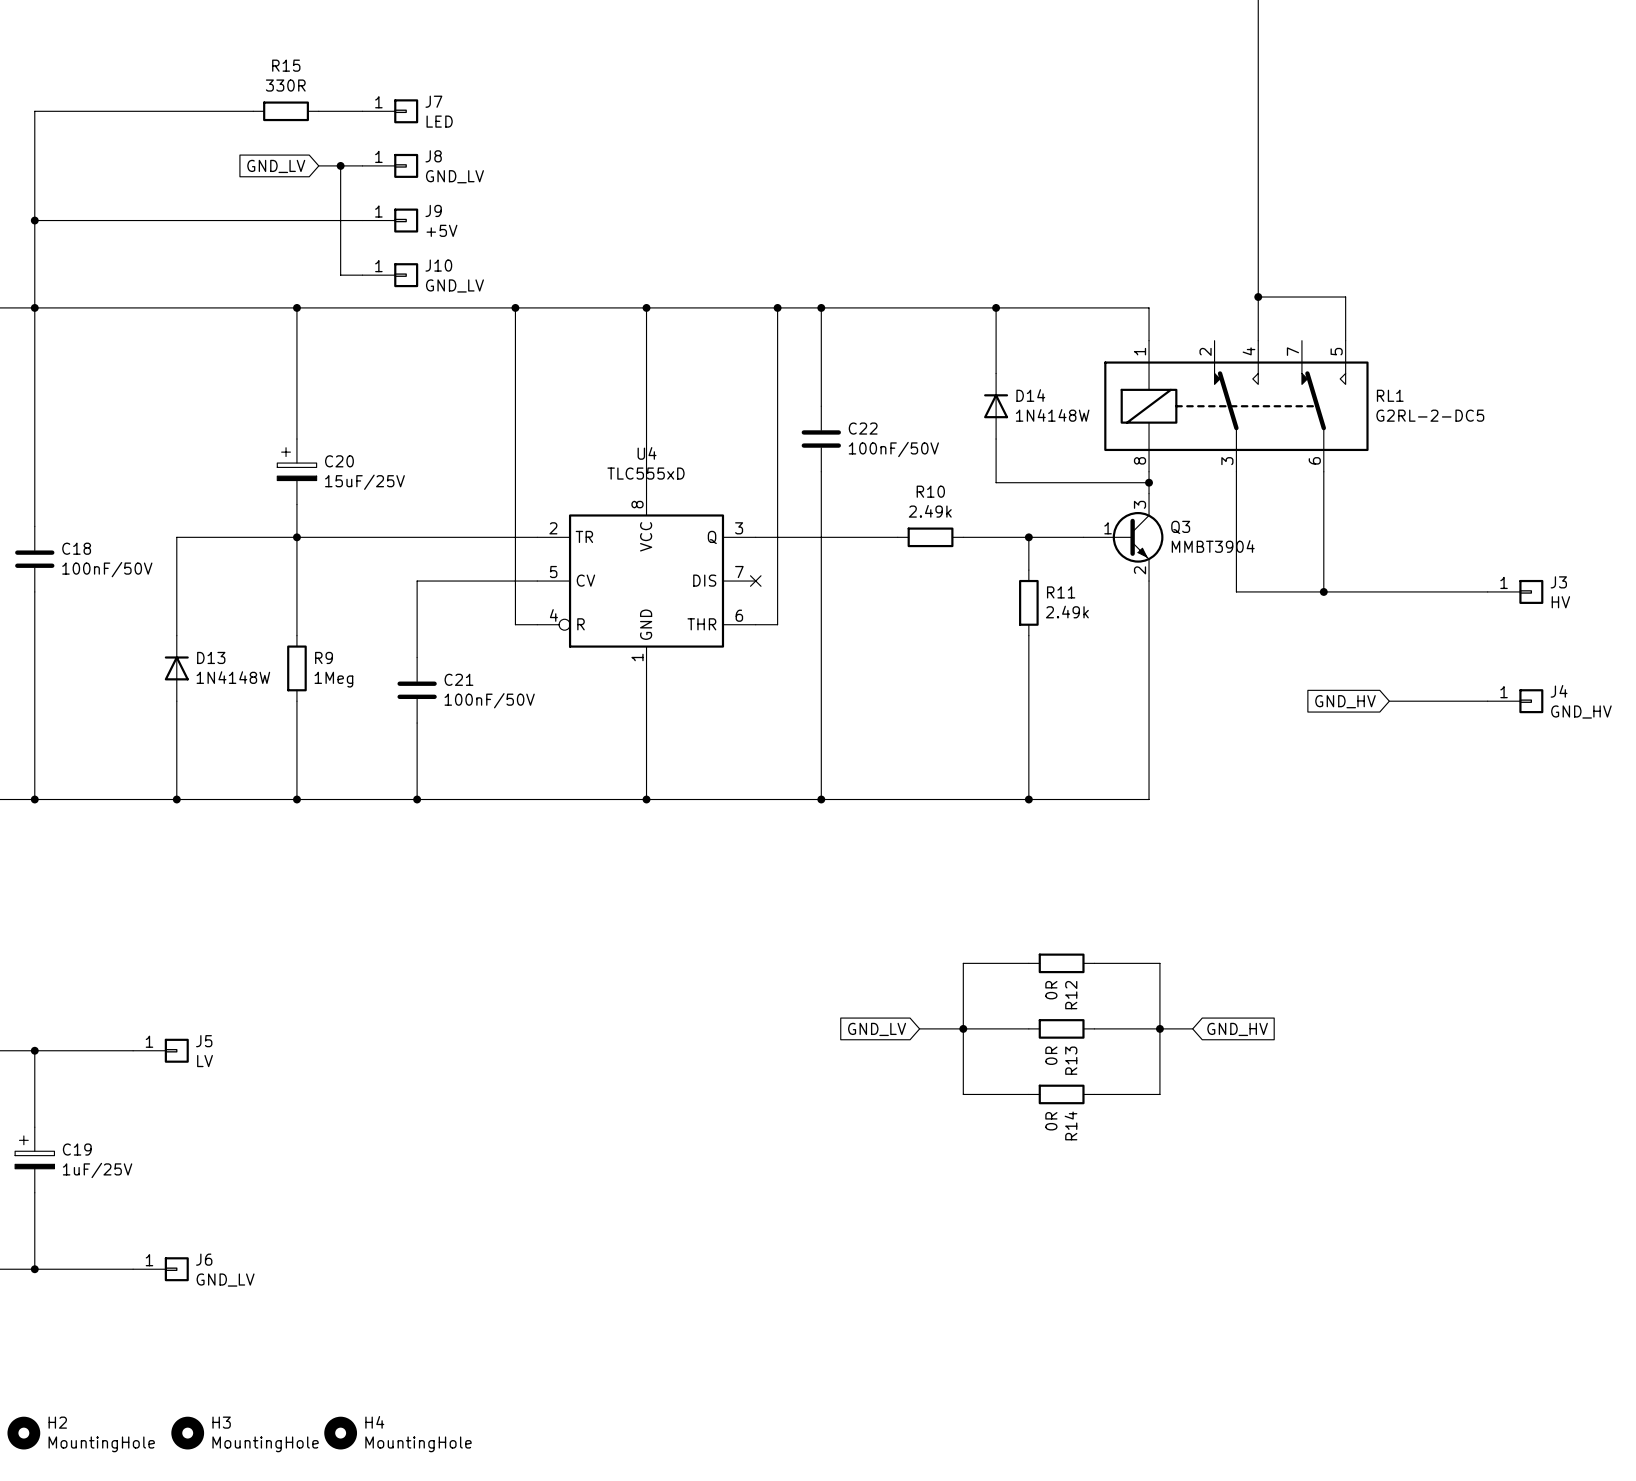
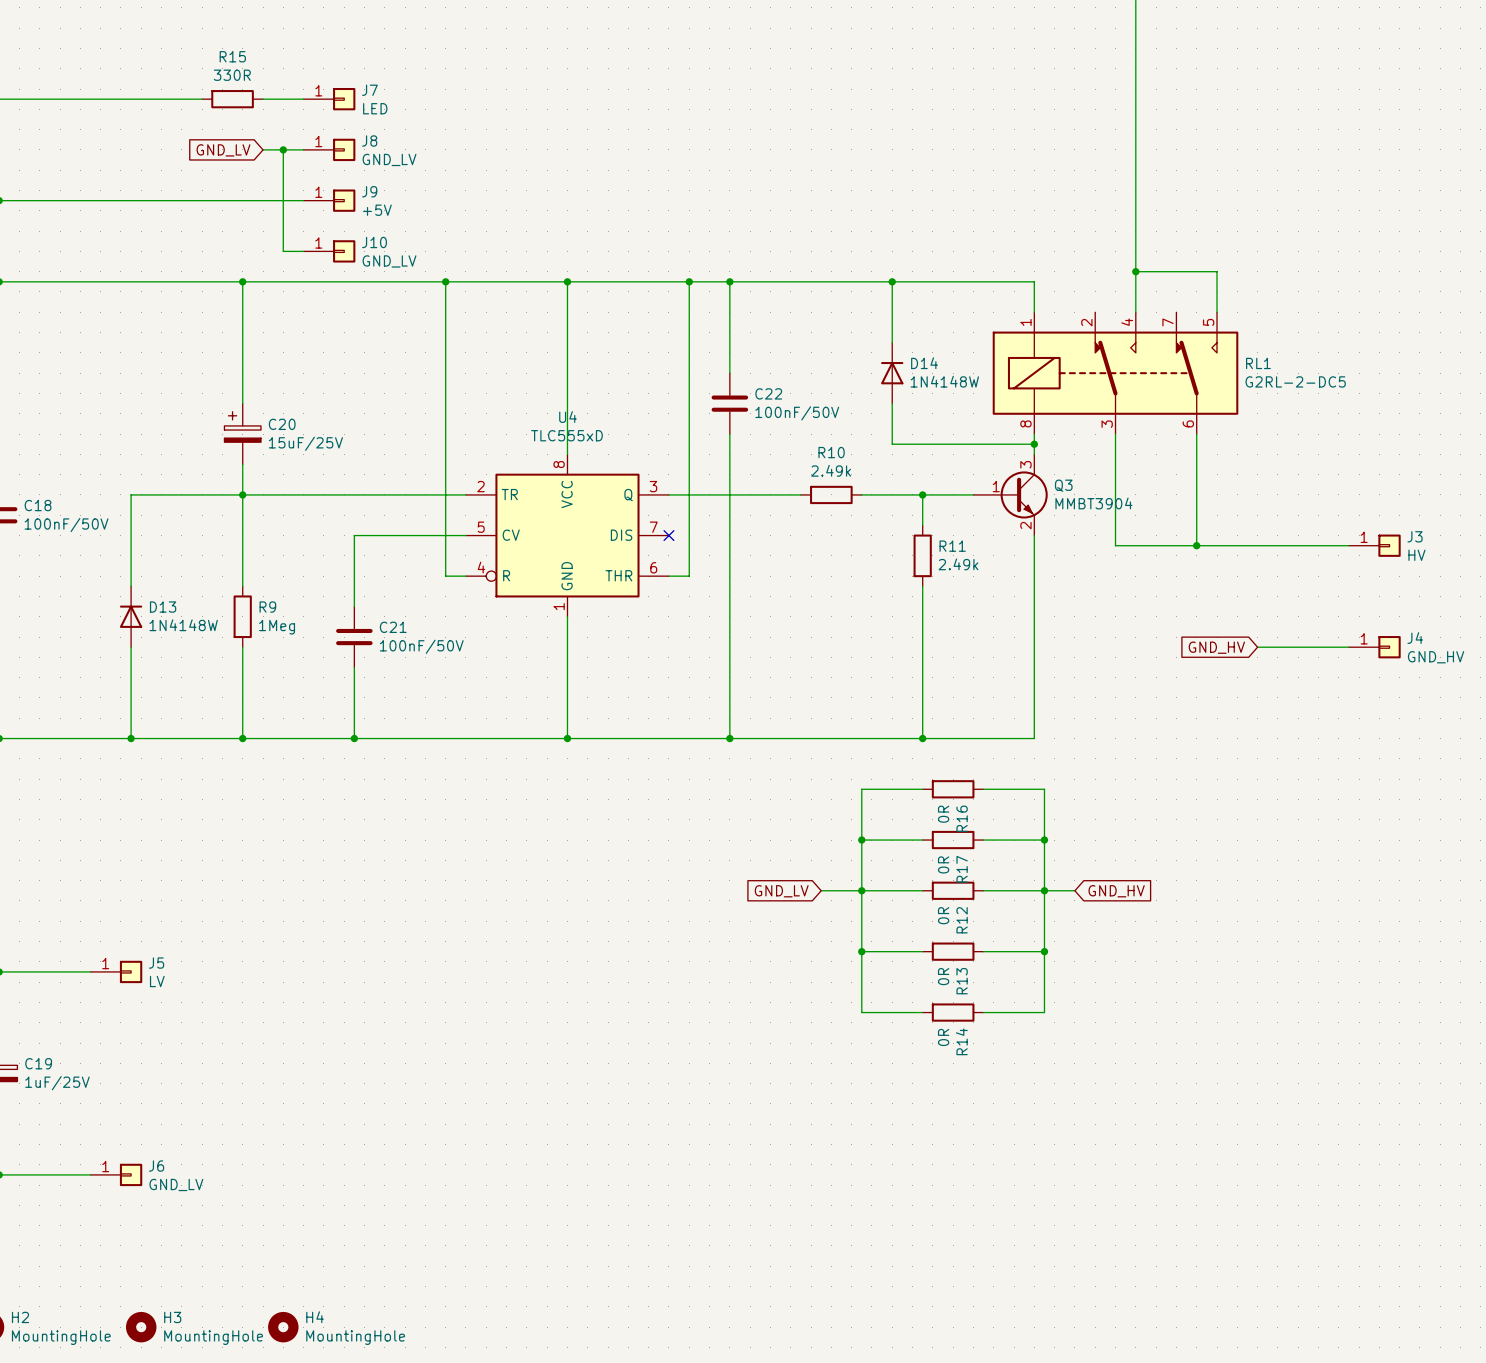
wire: none -> (922, 789) (861, 789) (861, 890) (821, 890)
R16: none -> 0R (953, 789)
wire: none -> (983, 789) (1044, 789) (1044, 890) (1074, 890)
wire: none -> (861, 840) (922, 840)
junction: none -> (861, 840)
R17: none -> 0R (953, 840)
wire: none -> (983, 840) (1044, 840)
junction: none -> (1044, 840)
junction: none -> (861, 890)
junction: none -> (1044, 890)
wire: (919, 1028) (963, 1028) -> none
wire: (1159, 1028) (1192, 1028) -> none
global label position: GND_LV (877, 1029) -> GND_LV (781, 891)
global label position: GND_HV (1237, 1029) -> GND_HV (1116, 891)

